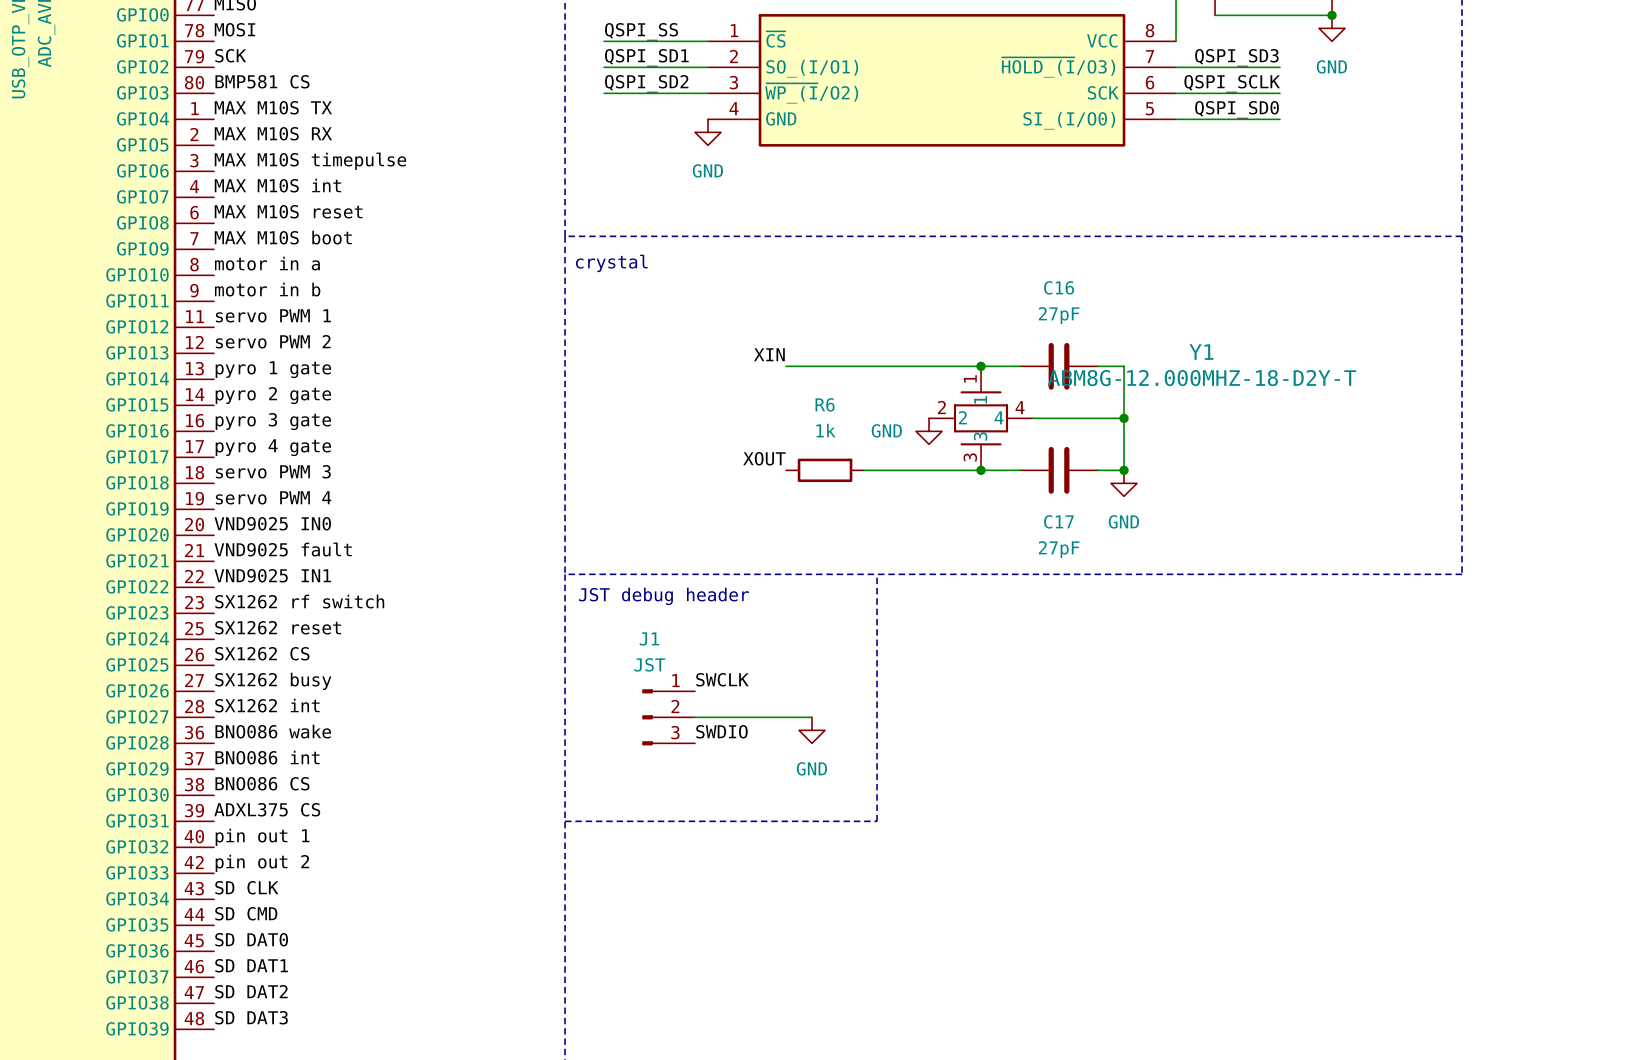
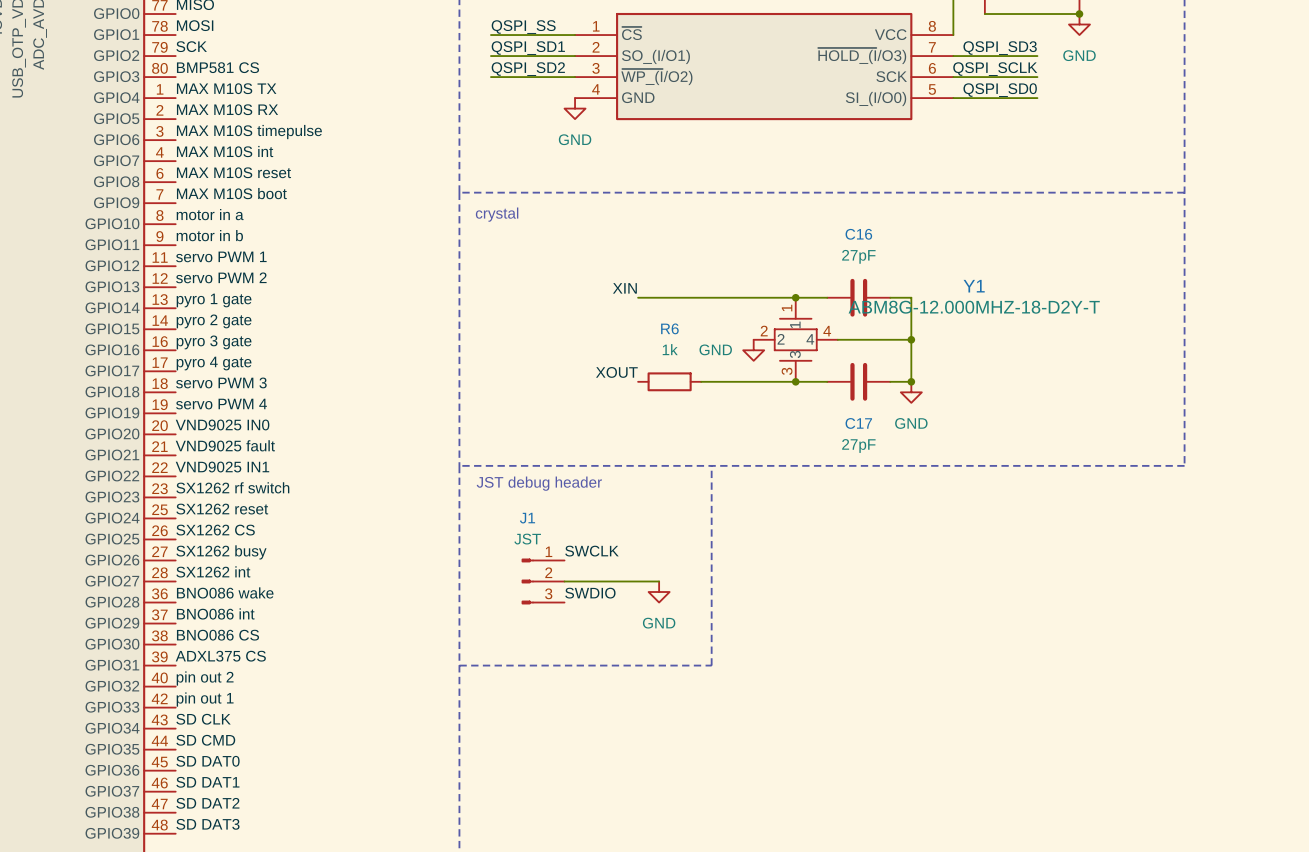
label: pin out 1 (262, 837) -> pin out 2 (205, 678)
label: pin out 2 (262, 863) -> pin out 1 (205, 699)

